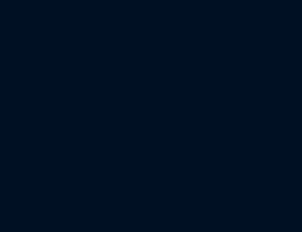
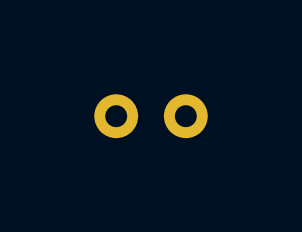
part: none -> (151, 116)

